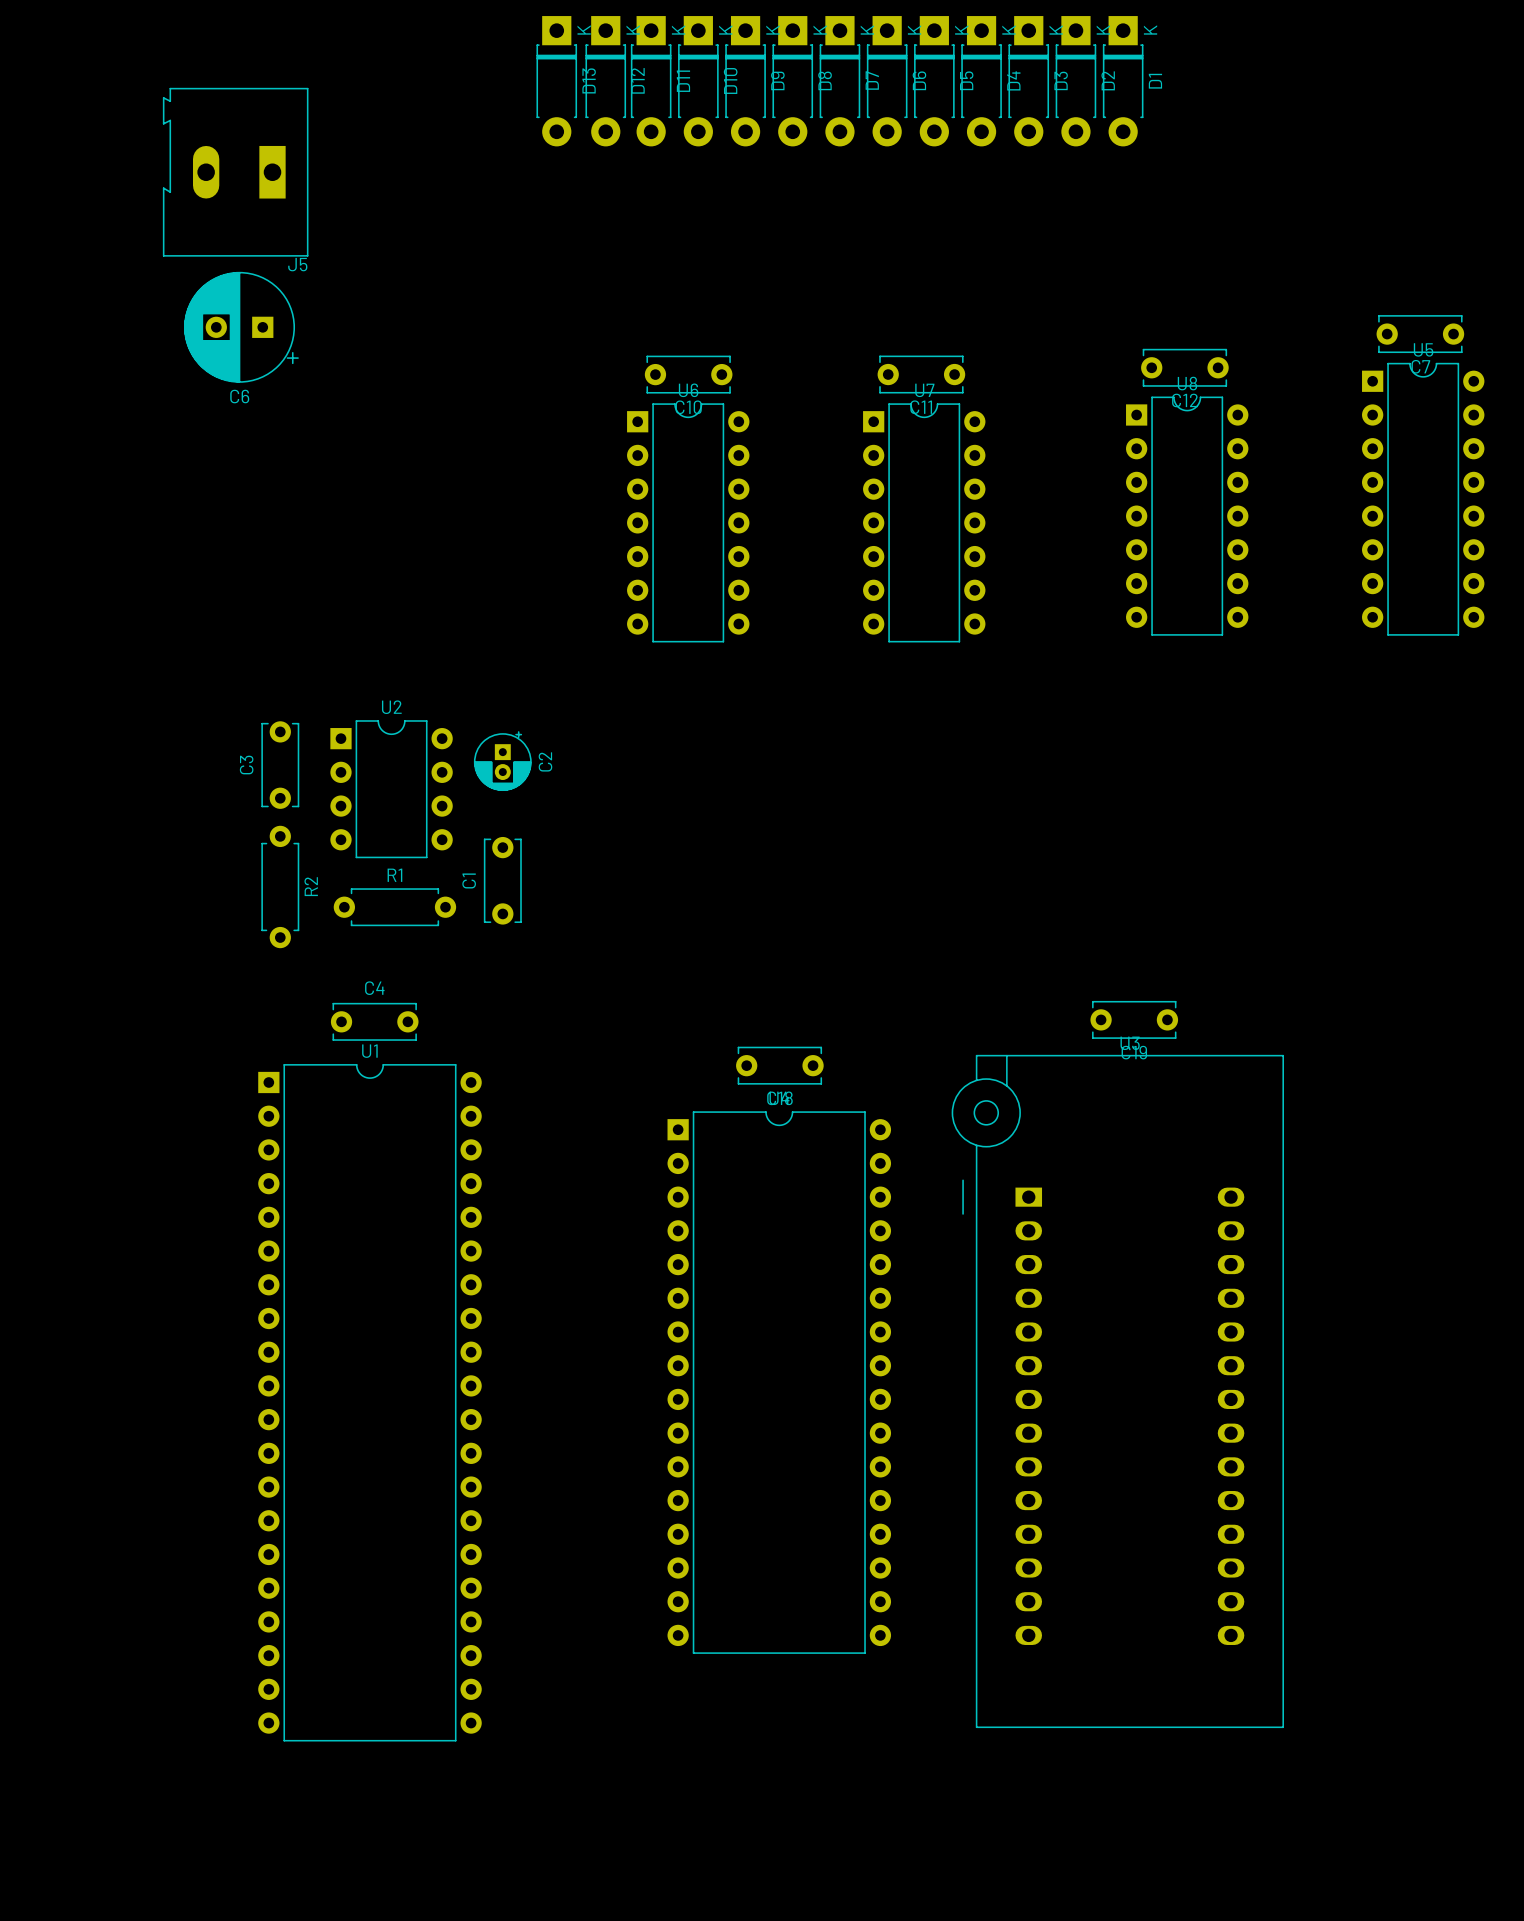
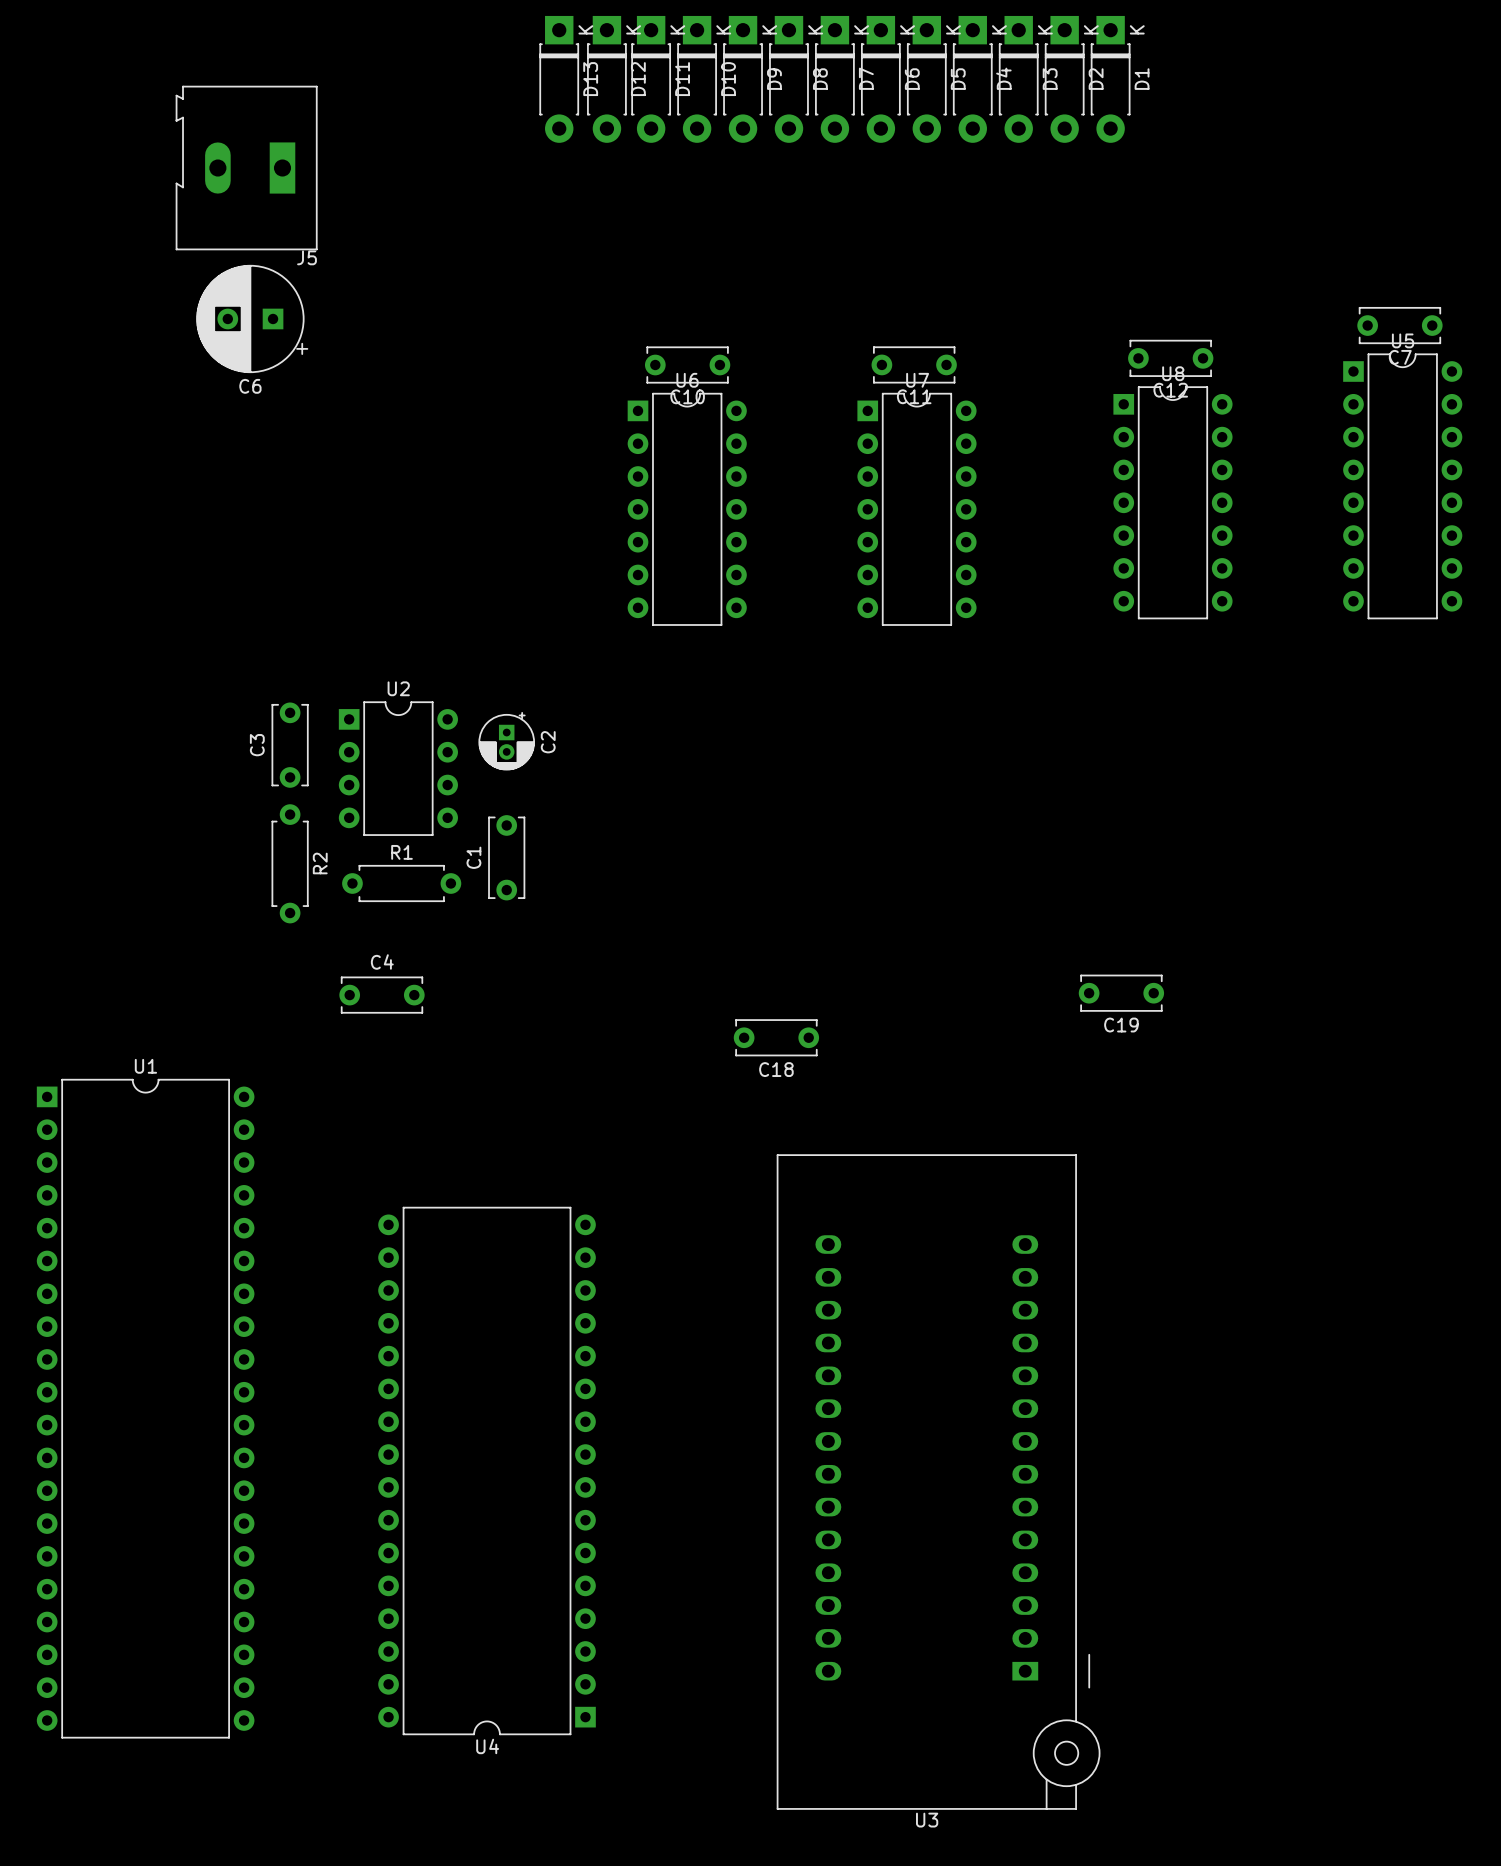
U4 rotation: 0° (779, 1382) -> 180° (487, 1470)
U3 rotation: 0° (1117, 1391) -> 180° (938, 1482)
U1 position: (369, 1402) -> (145, 1408)

